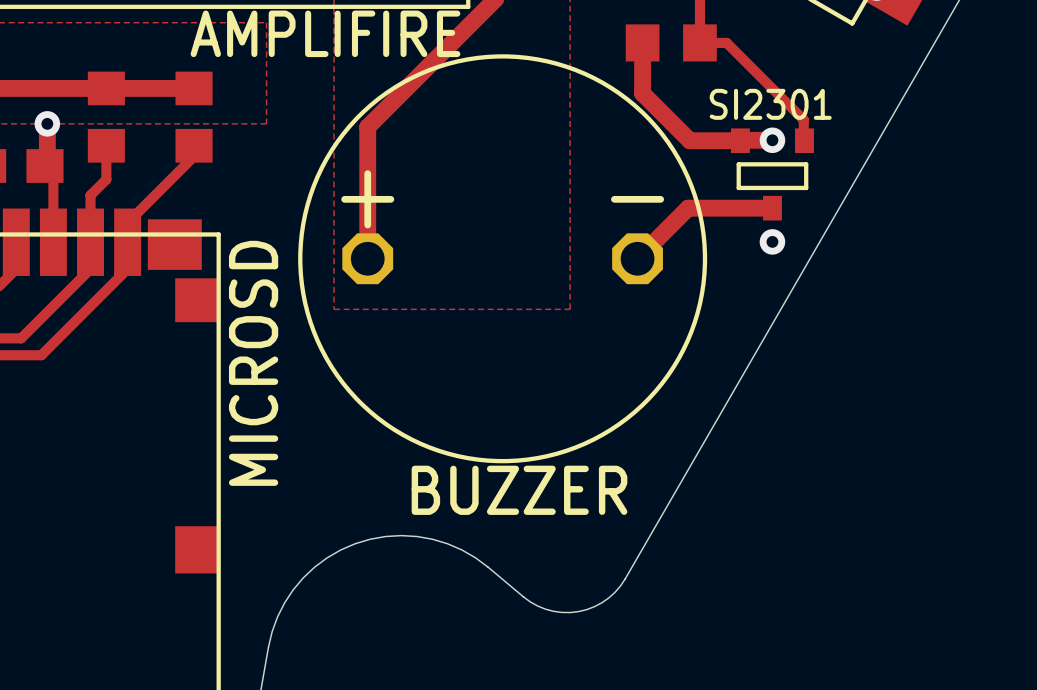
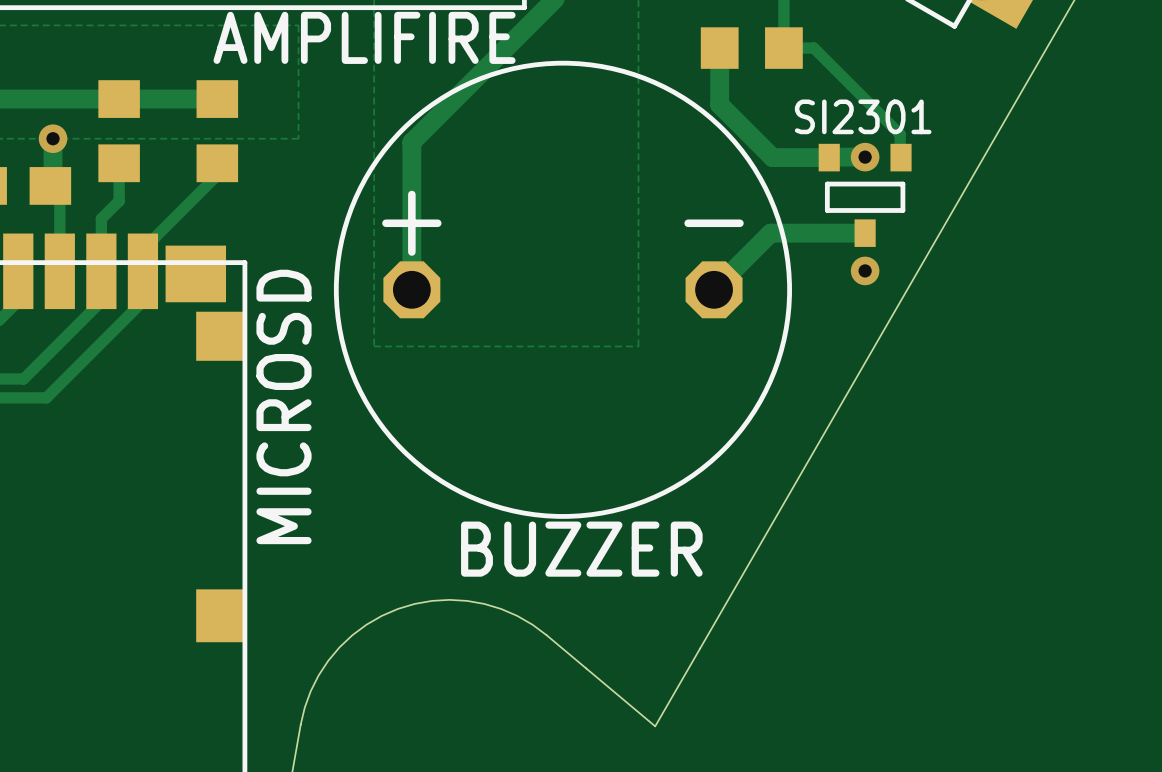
board edge: (625, 578) (608, 597) (594, 606) (578, 611) (553, 611) (537, 605) (523, 596) -> (700, 648) (655, 726) (586, 668)

